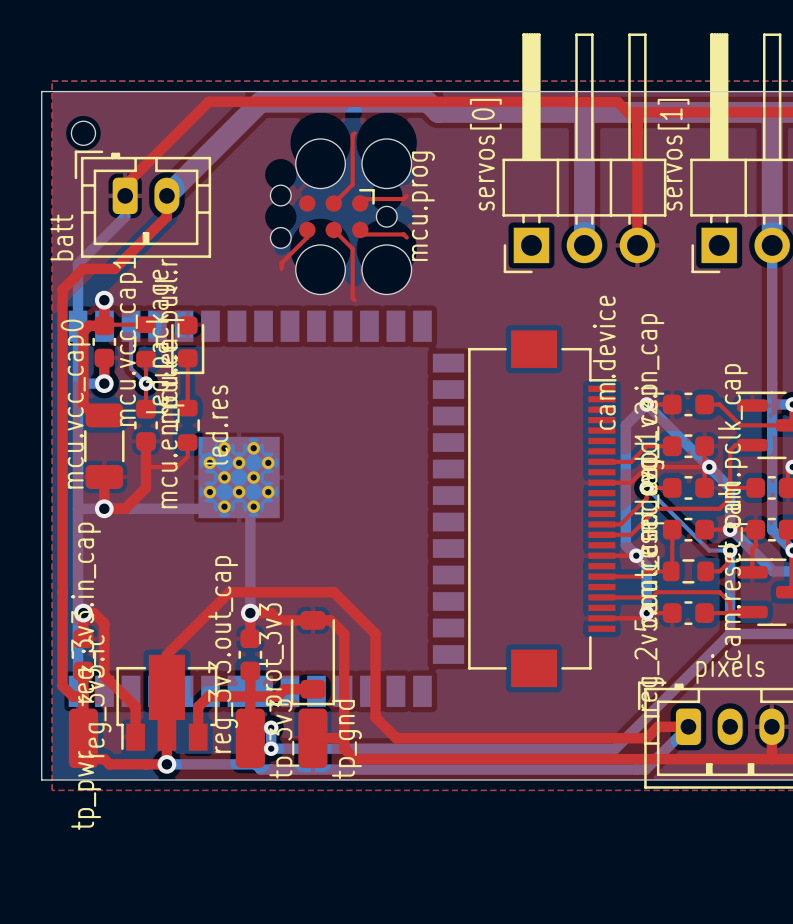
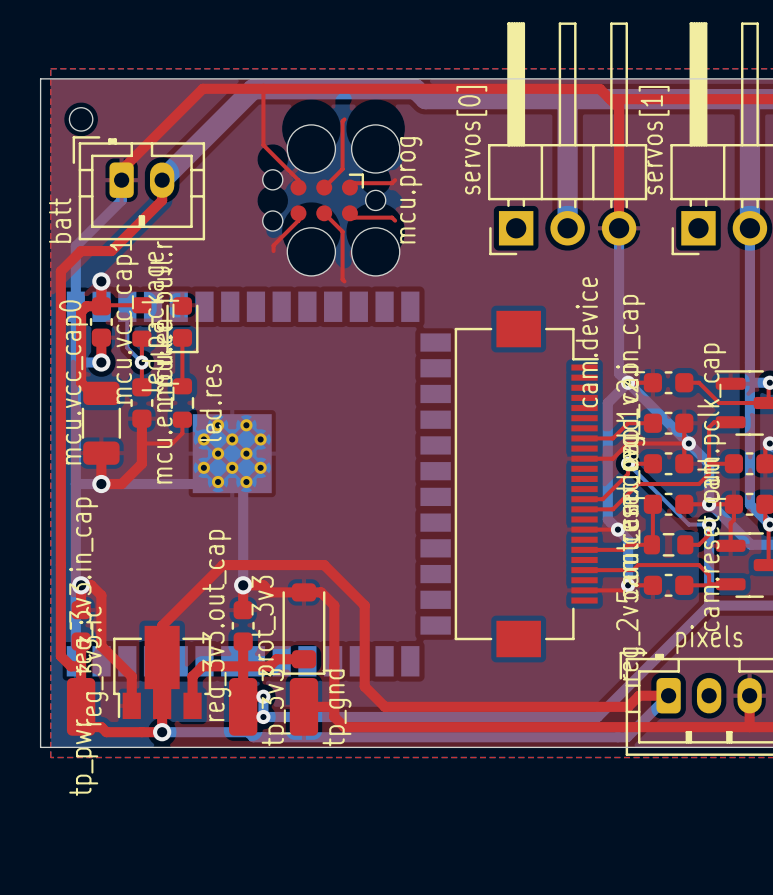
top track: none -> (263, 88) (263, 145) (298, 180) (298, 187)
bottom track: none -> (619, 228) (619, 373) (628, 382)

